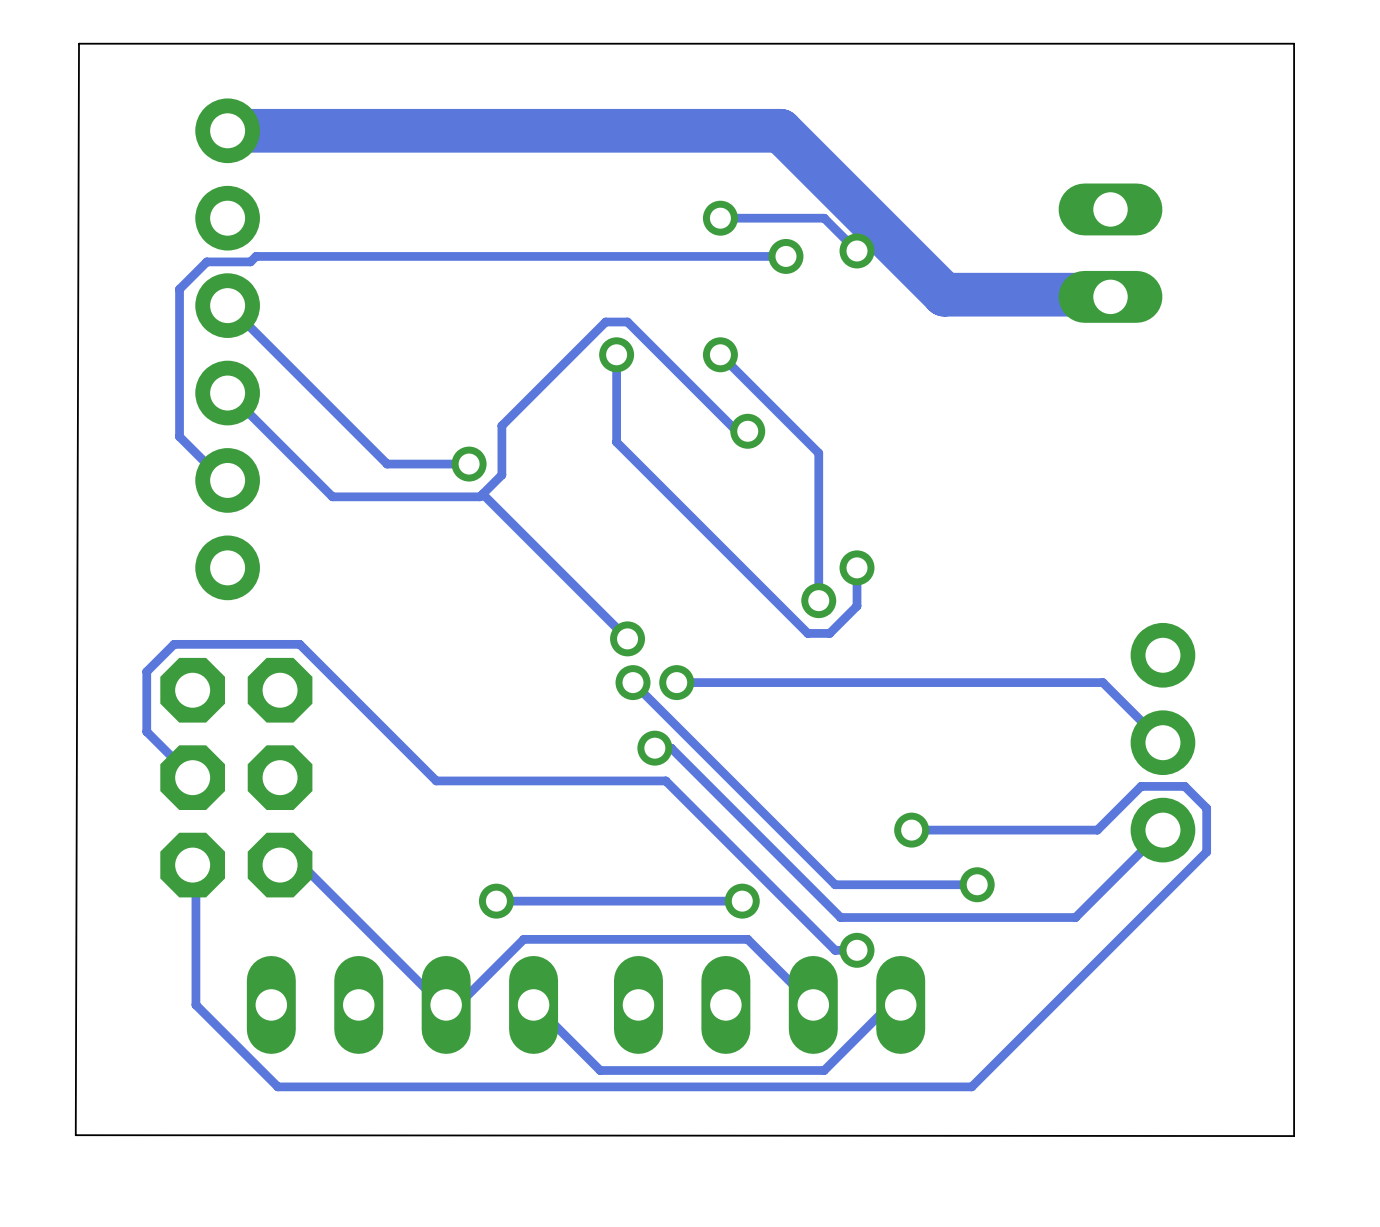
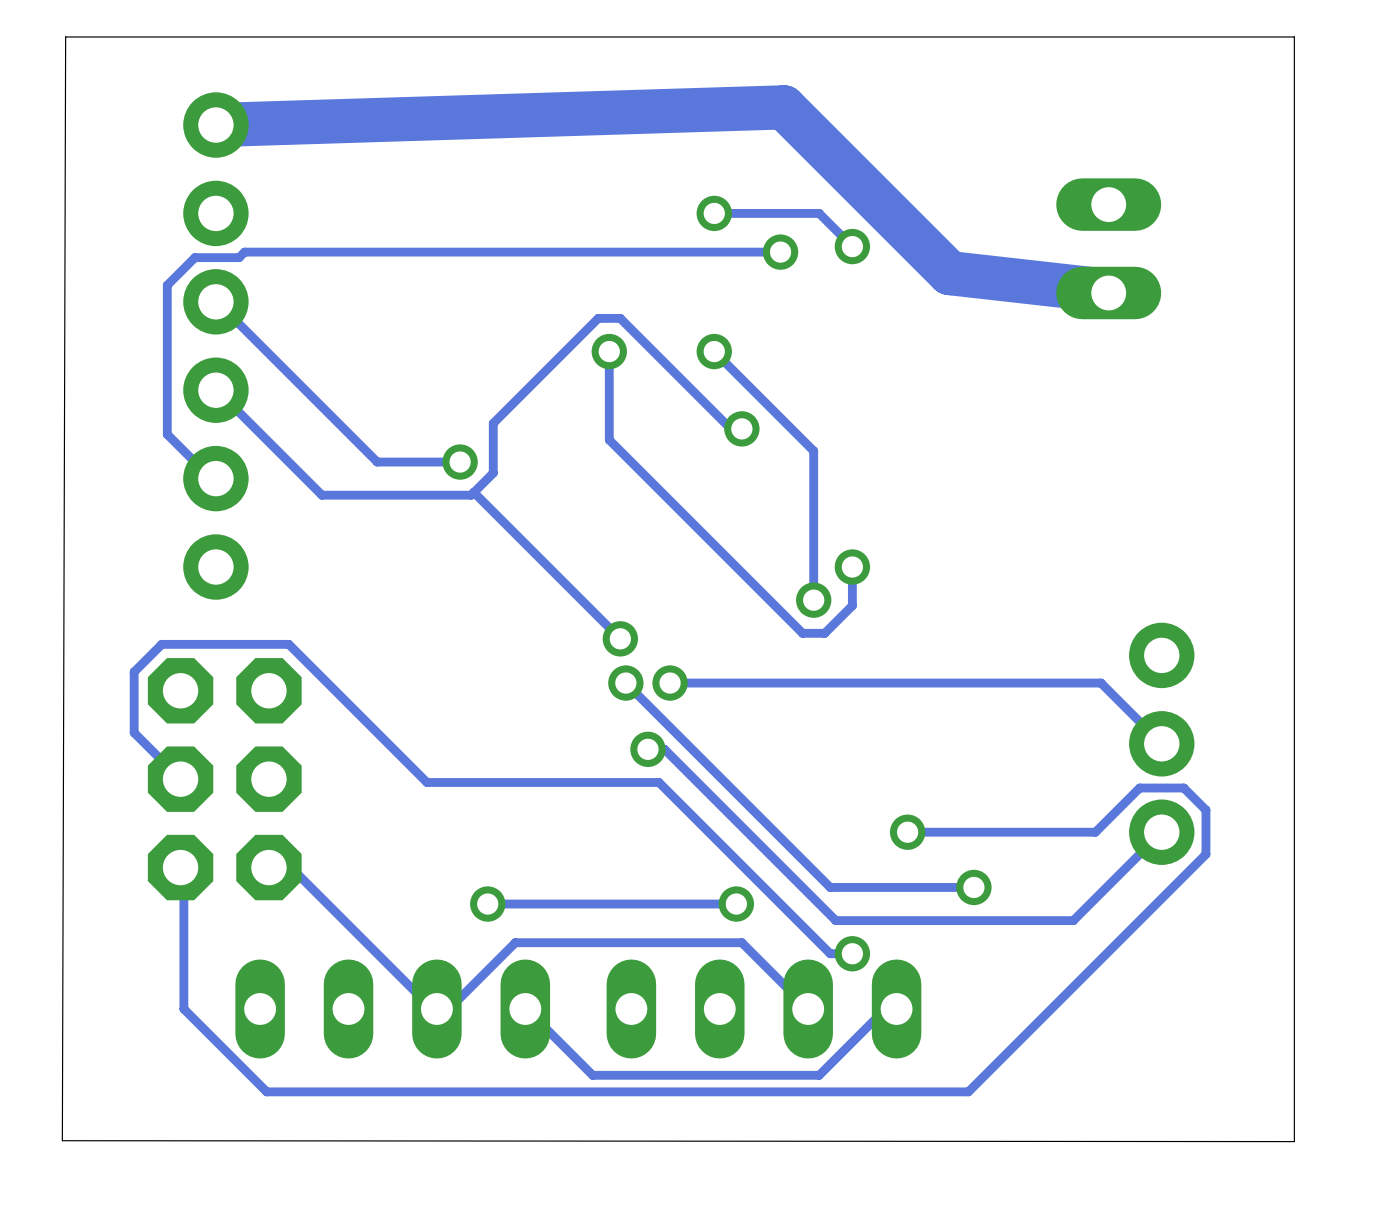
track: (227, 130) (780, 130) (944, 294) (1108, 294) -> (215, 125) (783, 107) (949, 273) (1106, 290)

